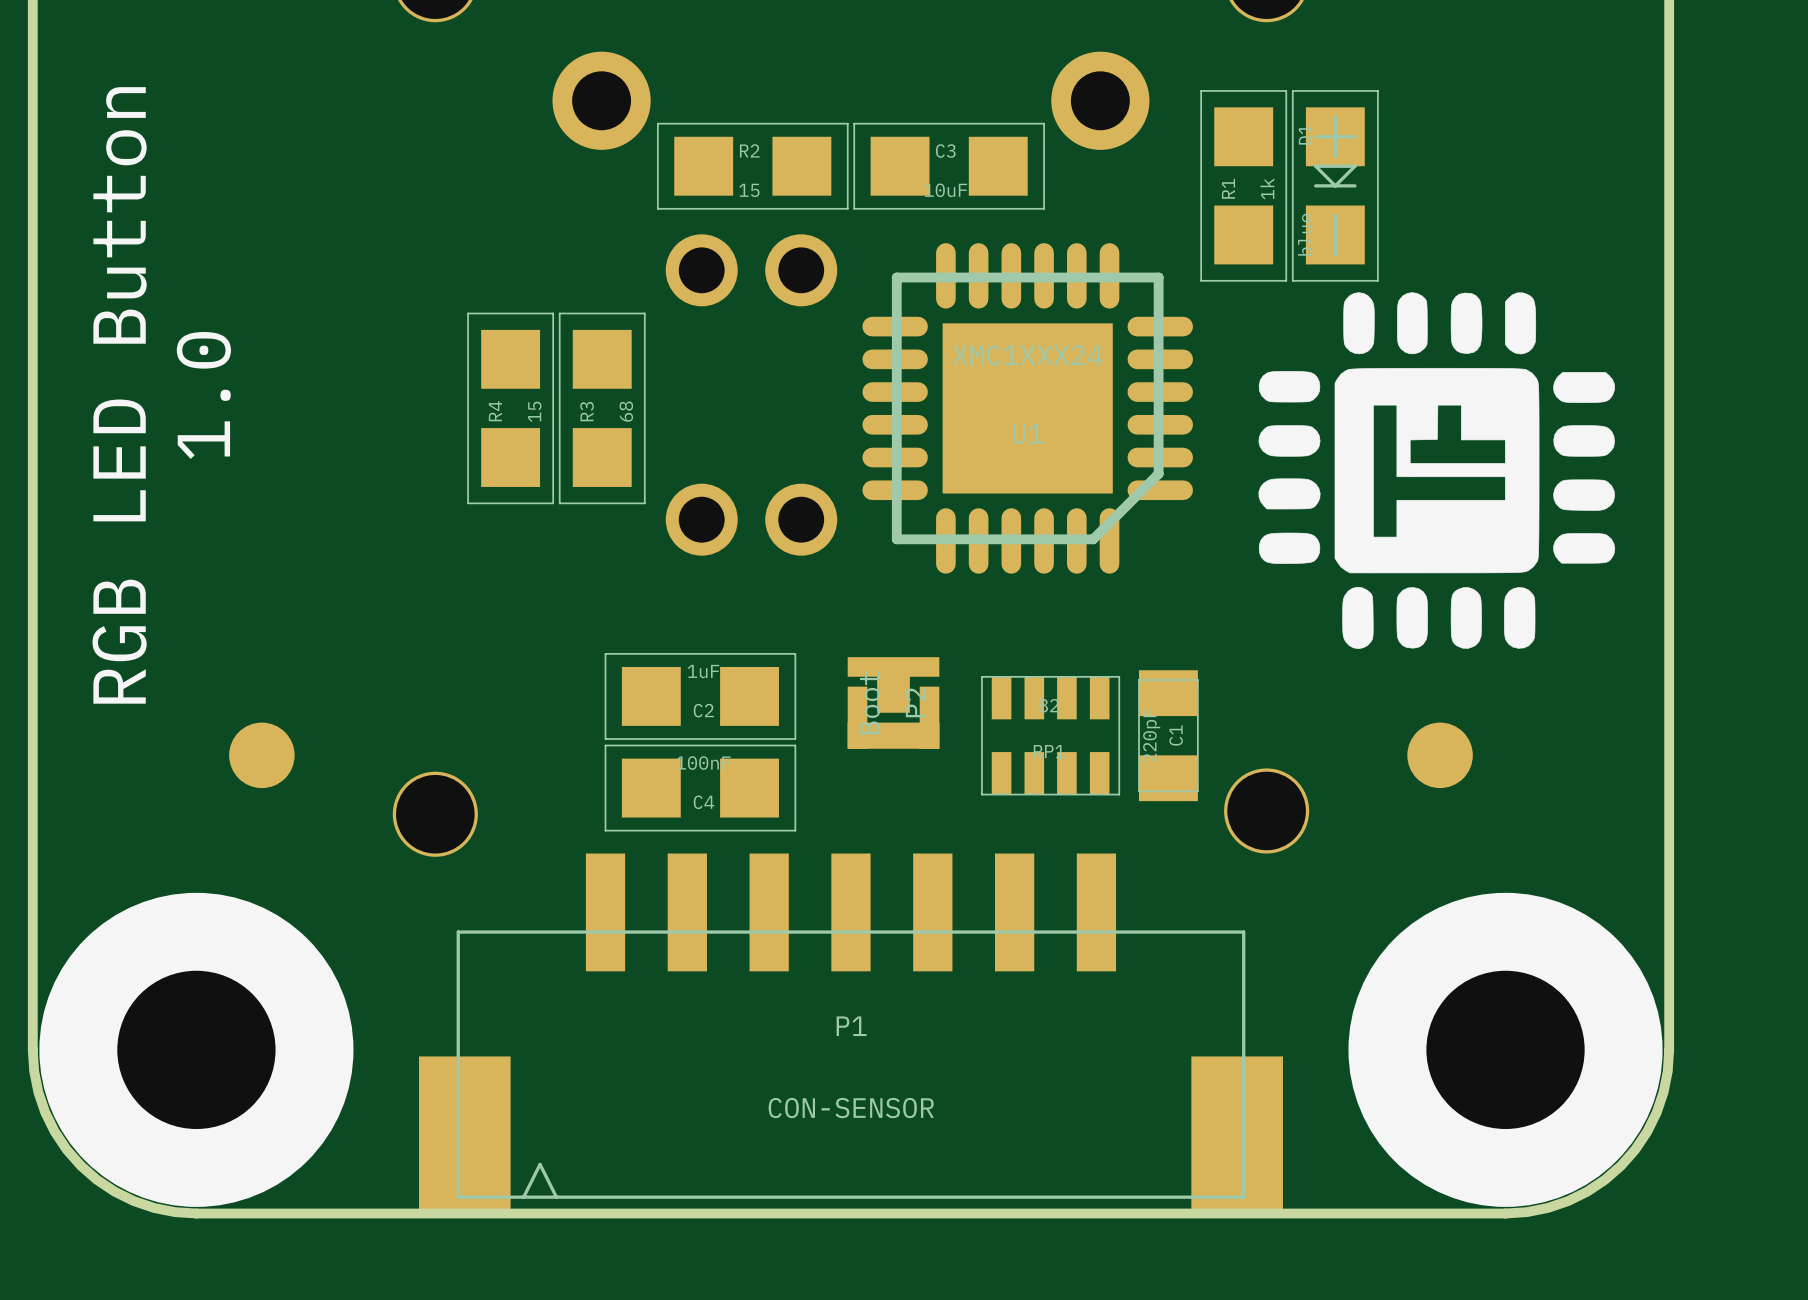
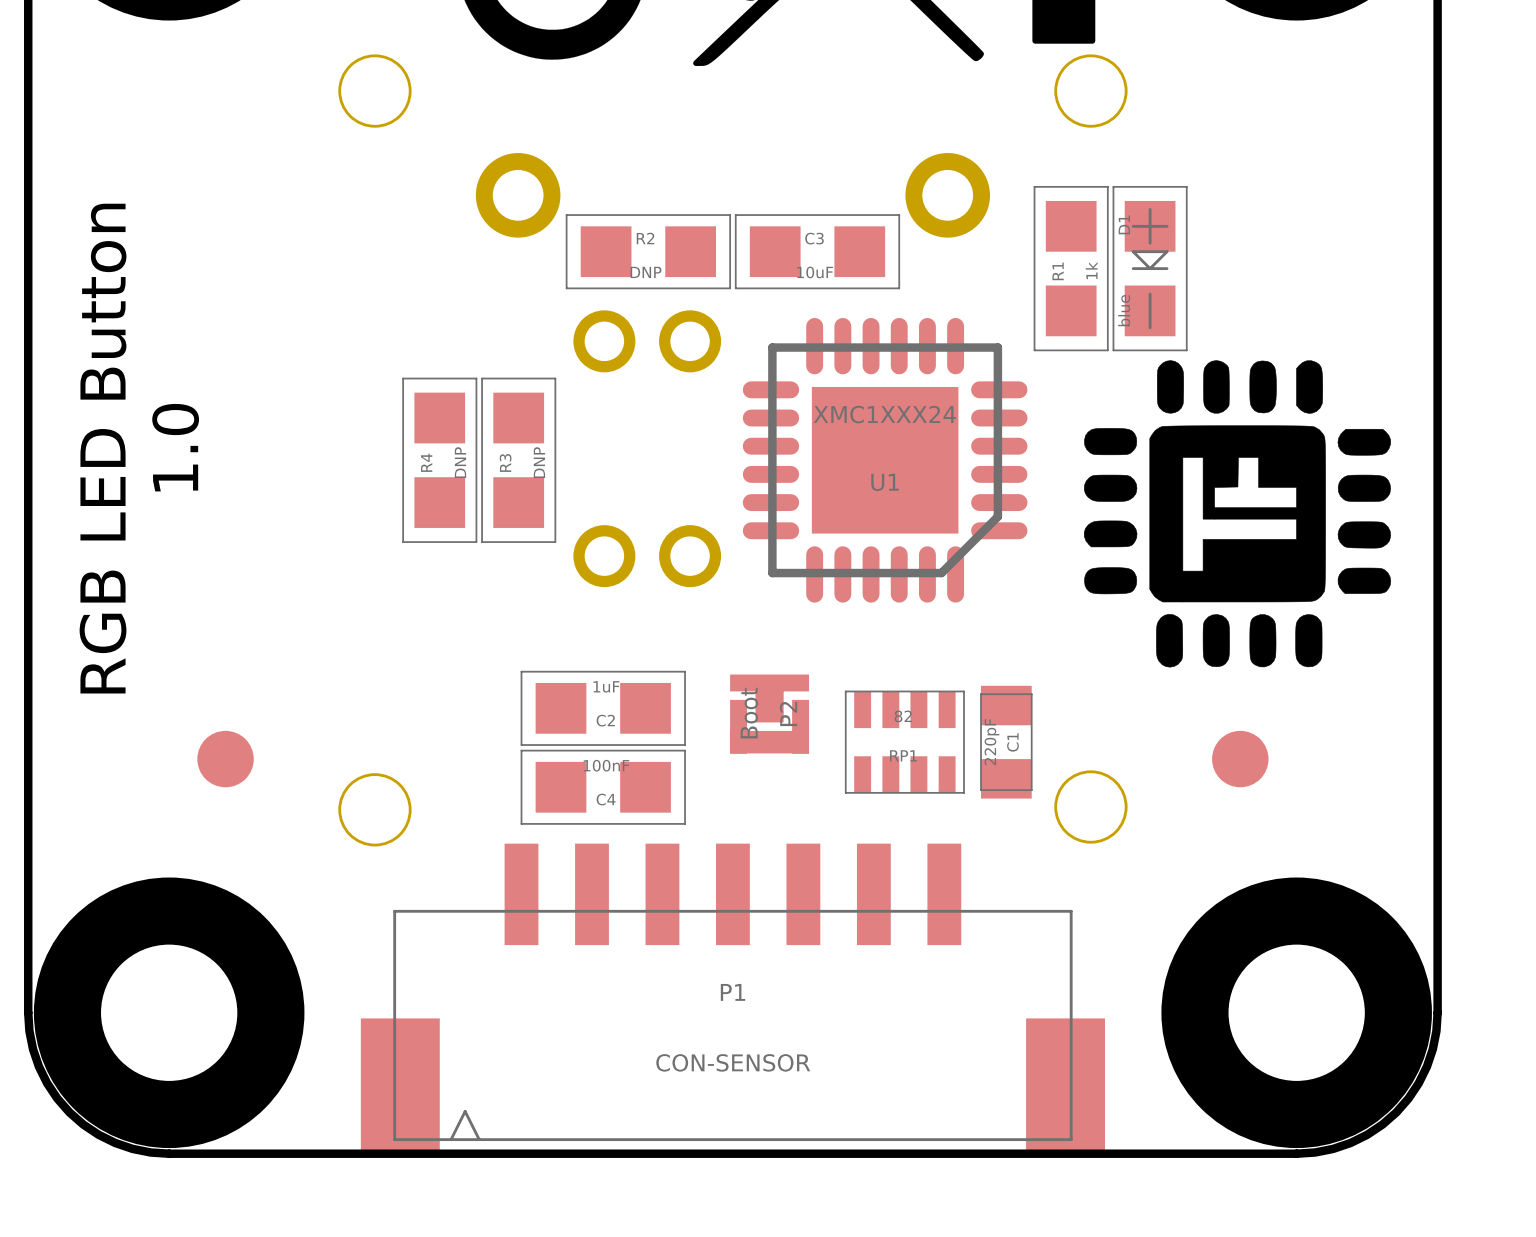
R2 value: 15 (749, 190) -> DNP (646, 272)
R4 value: 15 (534, 411) -> DNP (460, 462)
R3 value: 68 (626, 411) -> DNP (539, 462)

